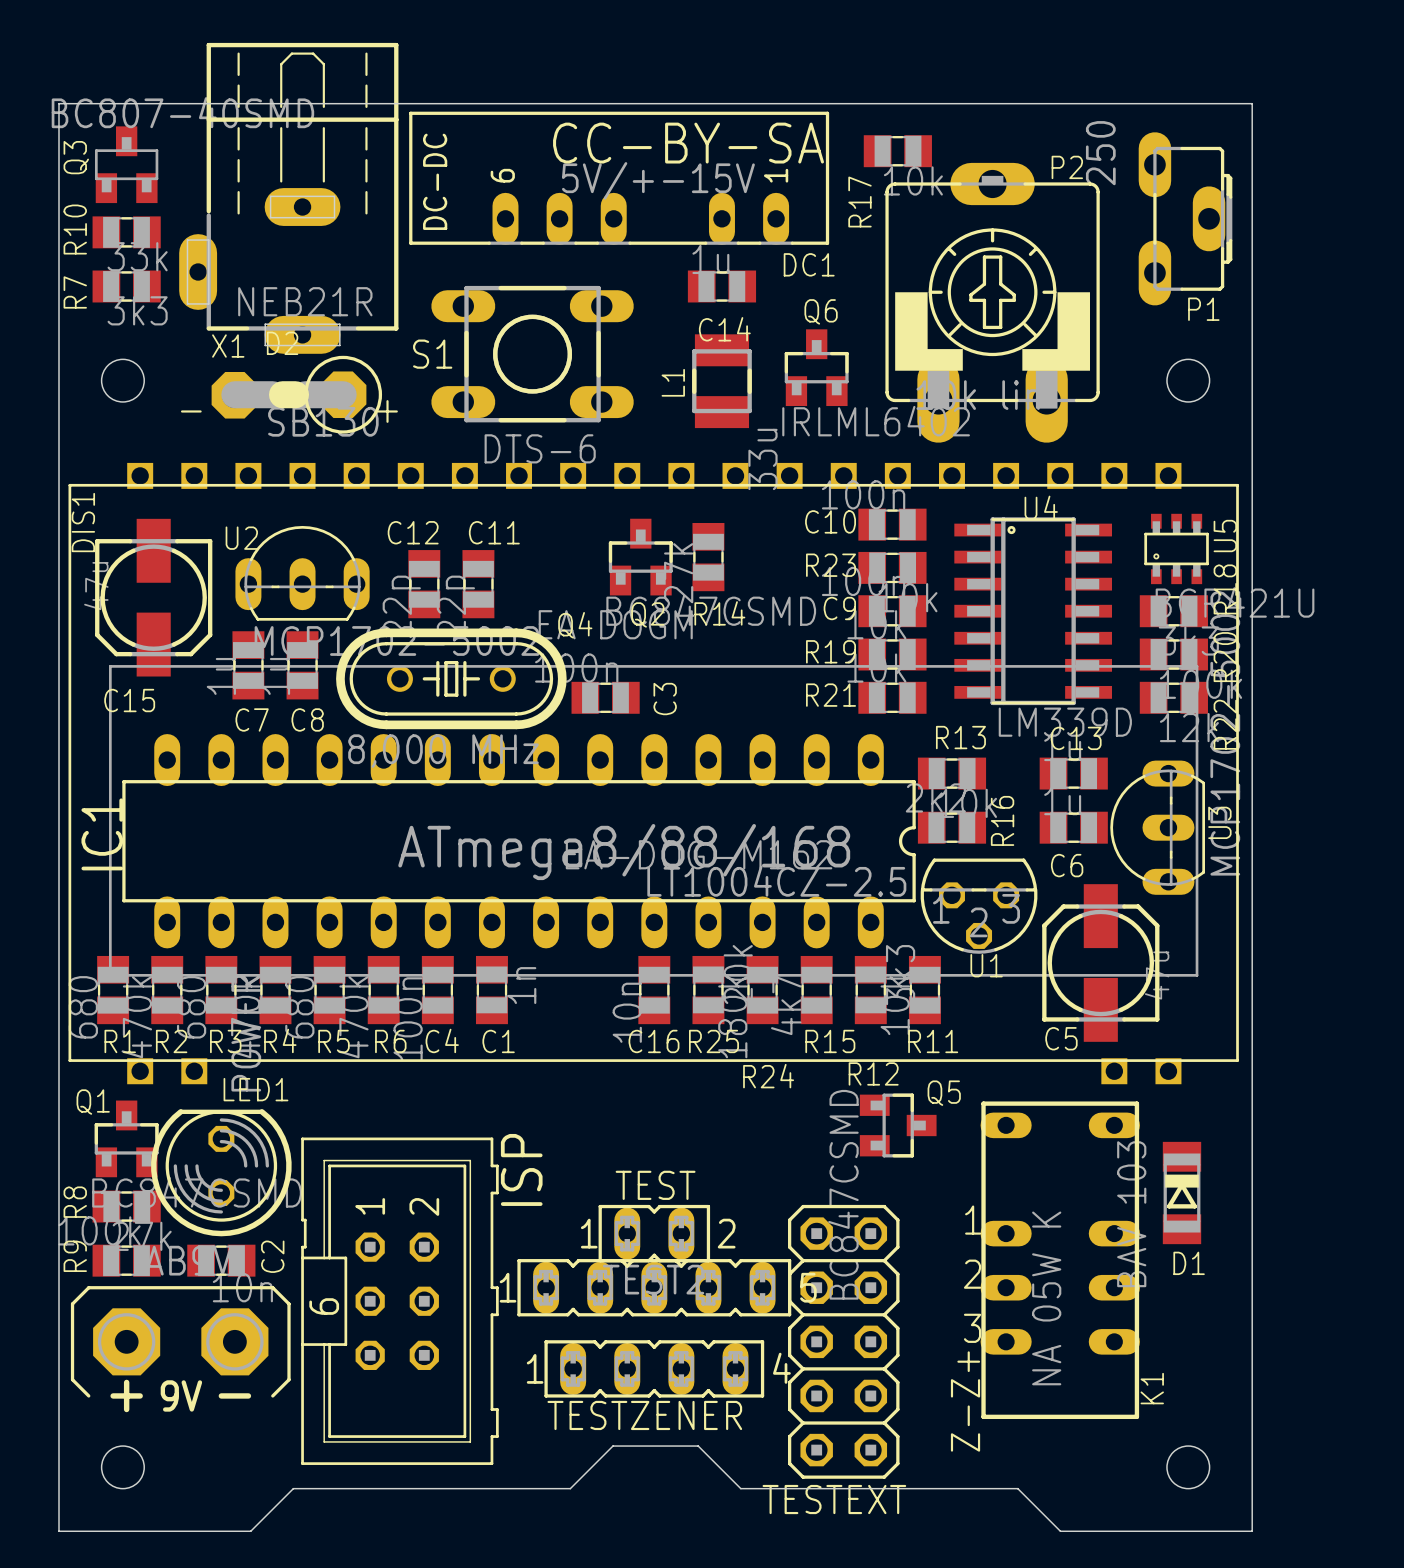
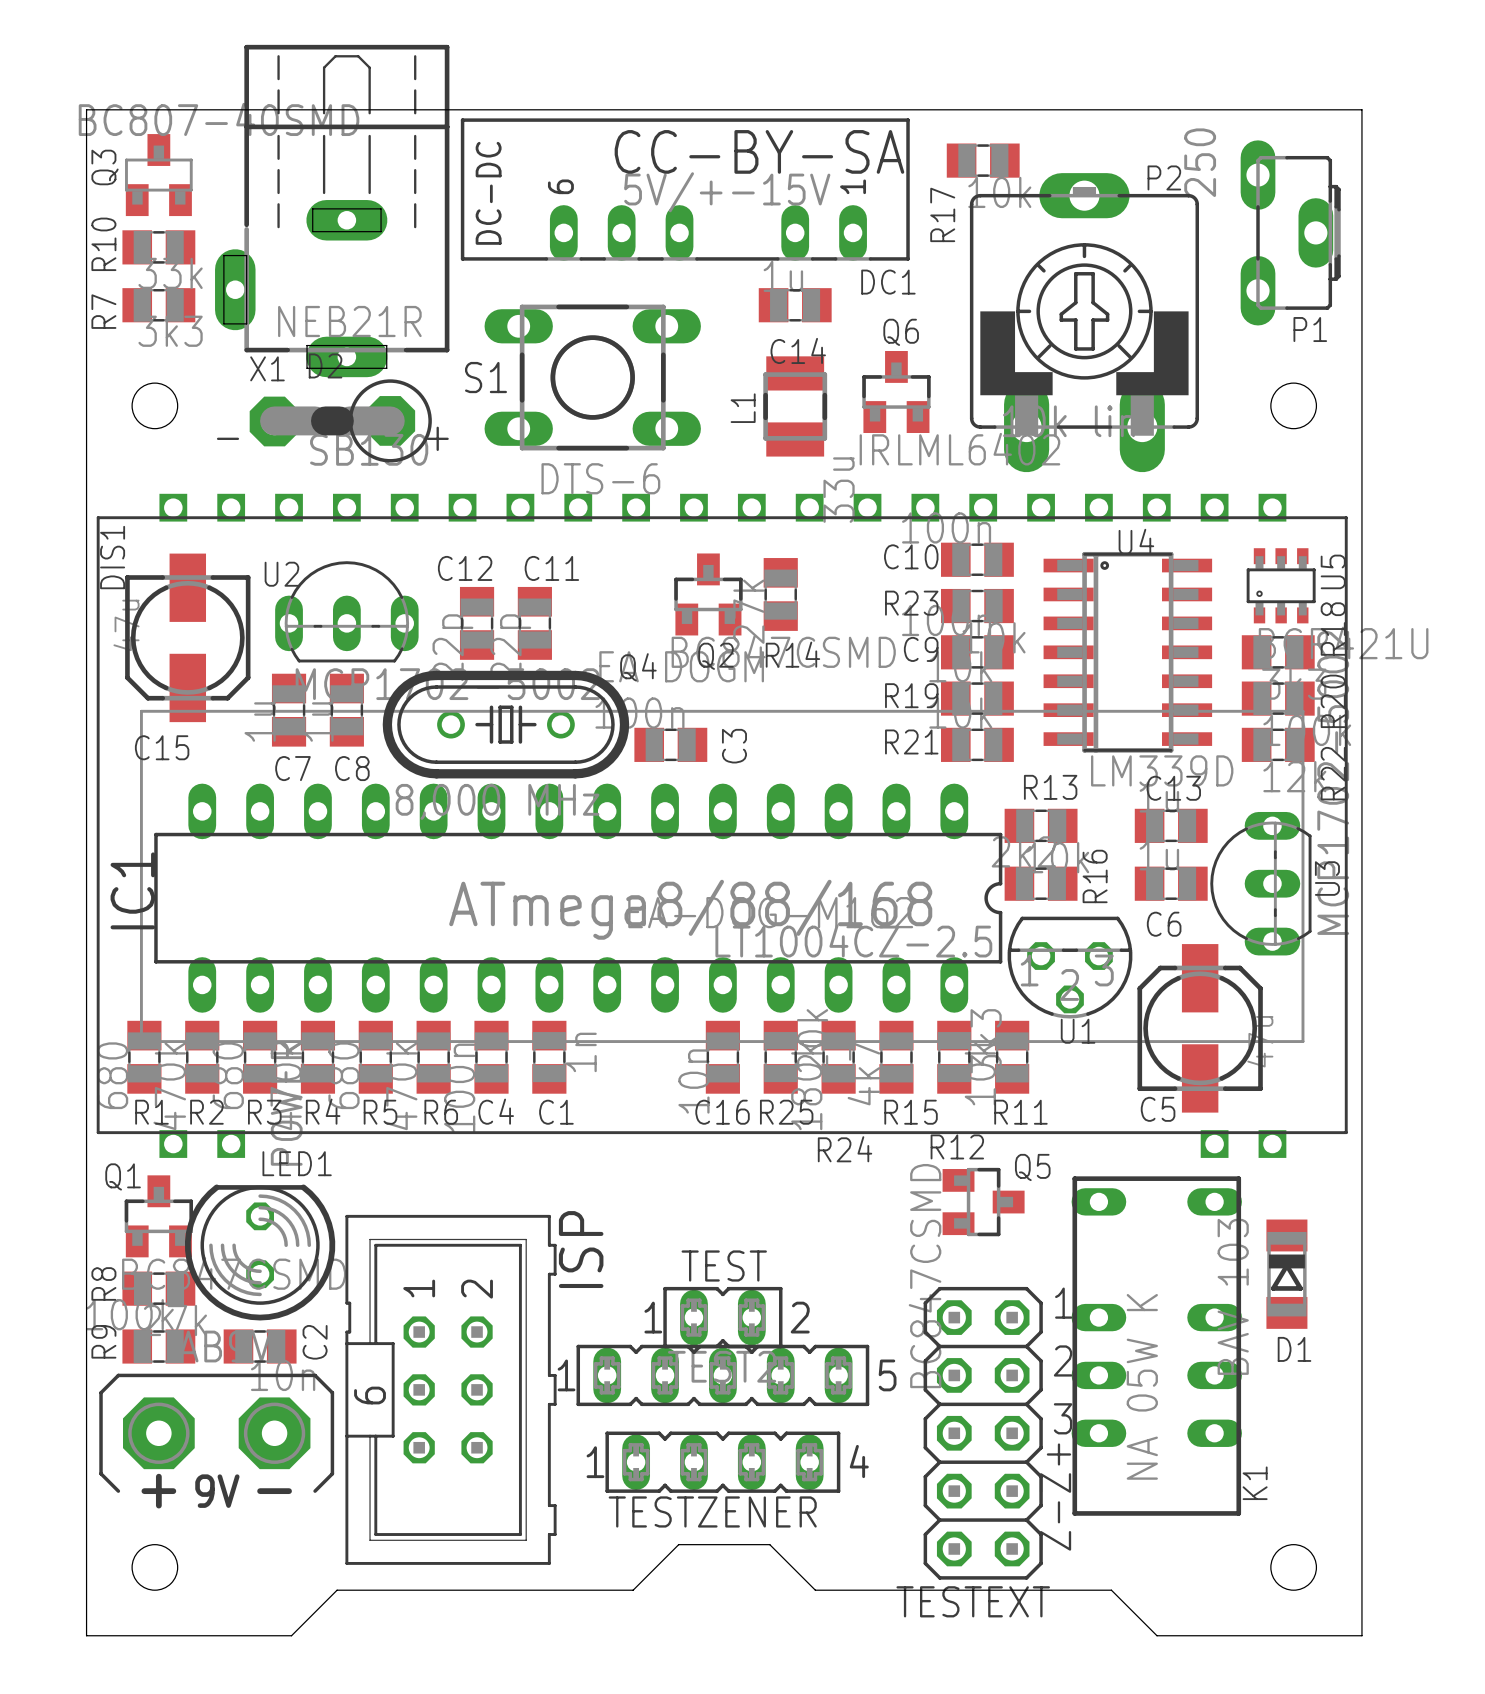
part position: (843, 1341) -> (983, 1433)

